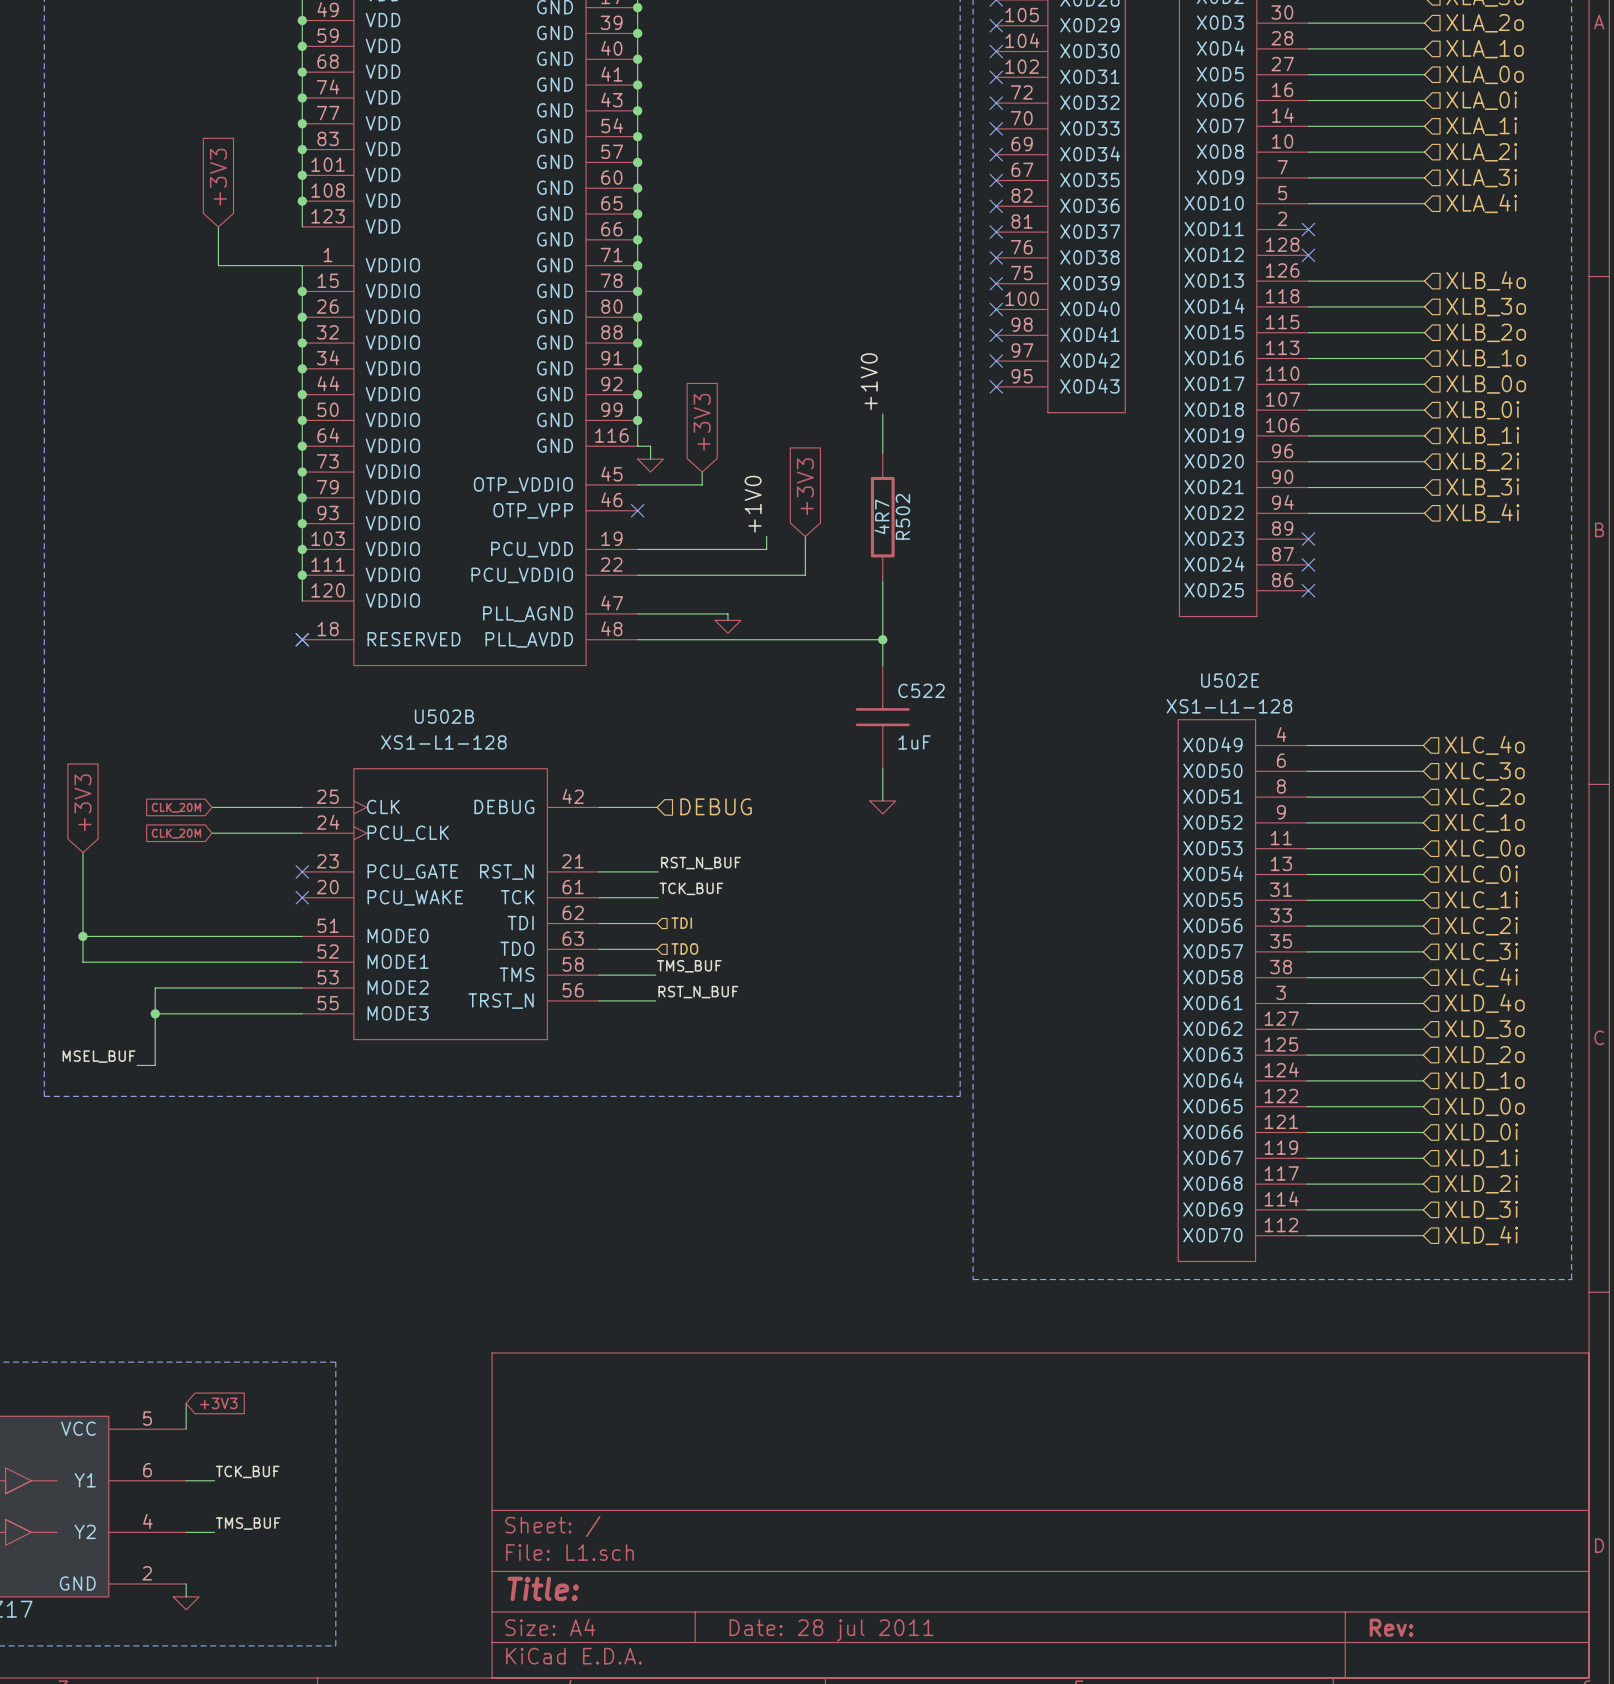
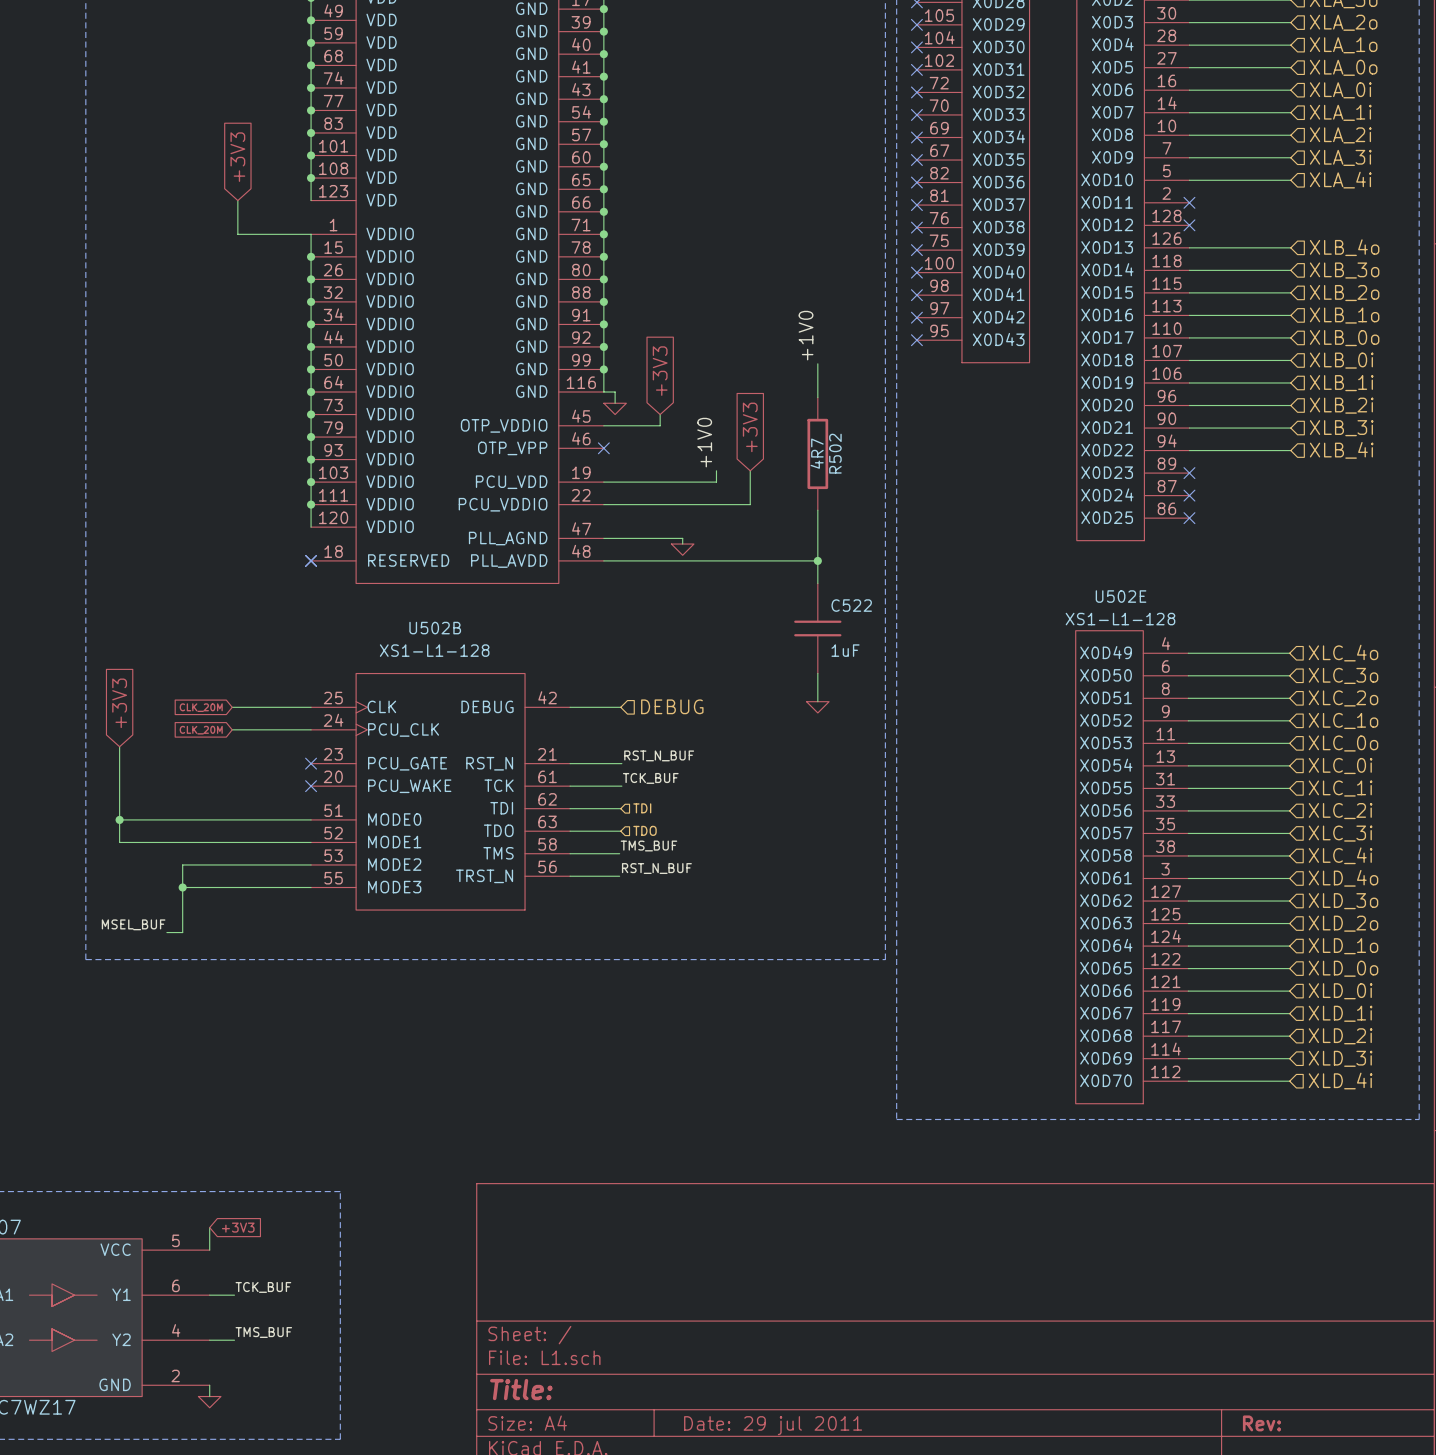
title block: Date: 28 jul 2011 (831, 1630) -> Date: 29 jul 2011 (773, 1425)

